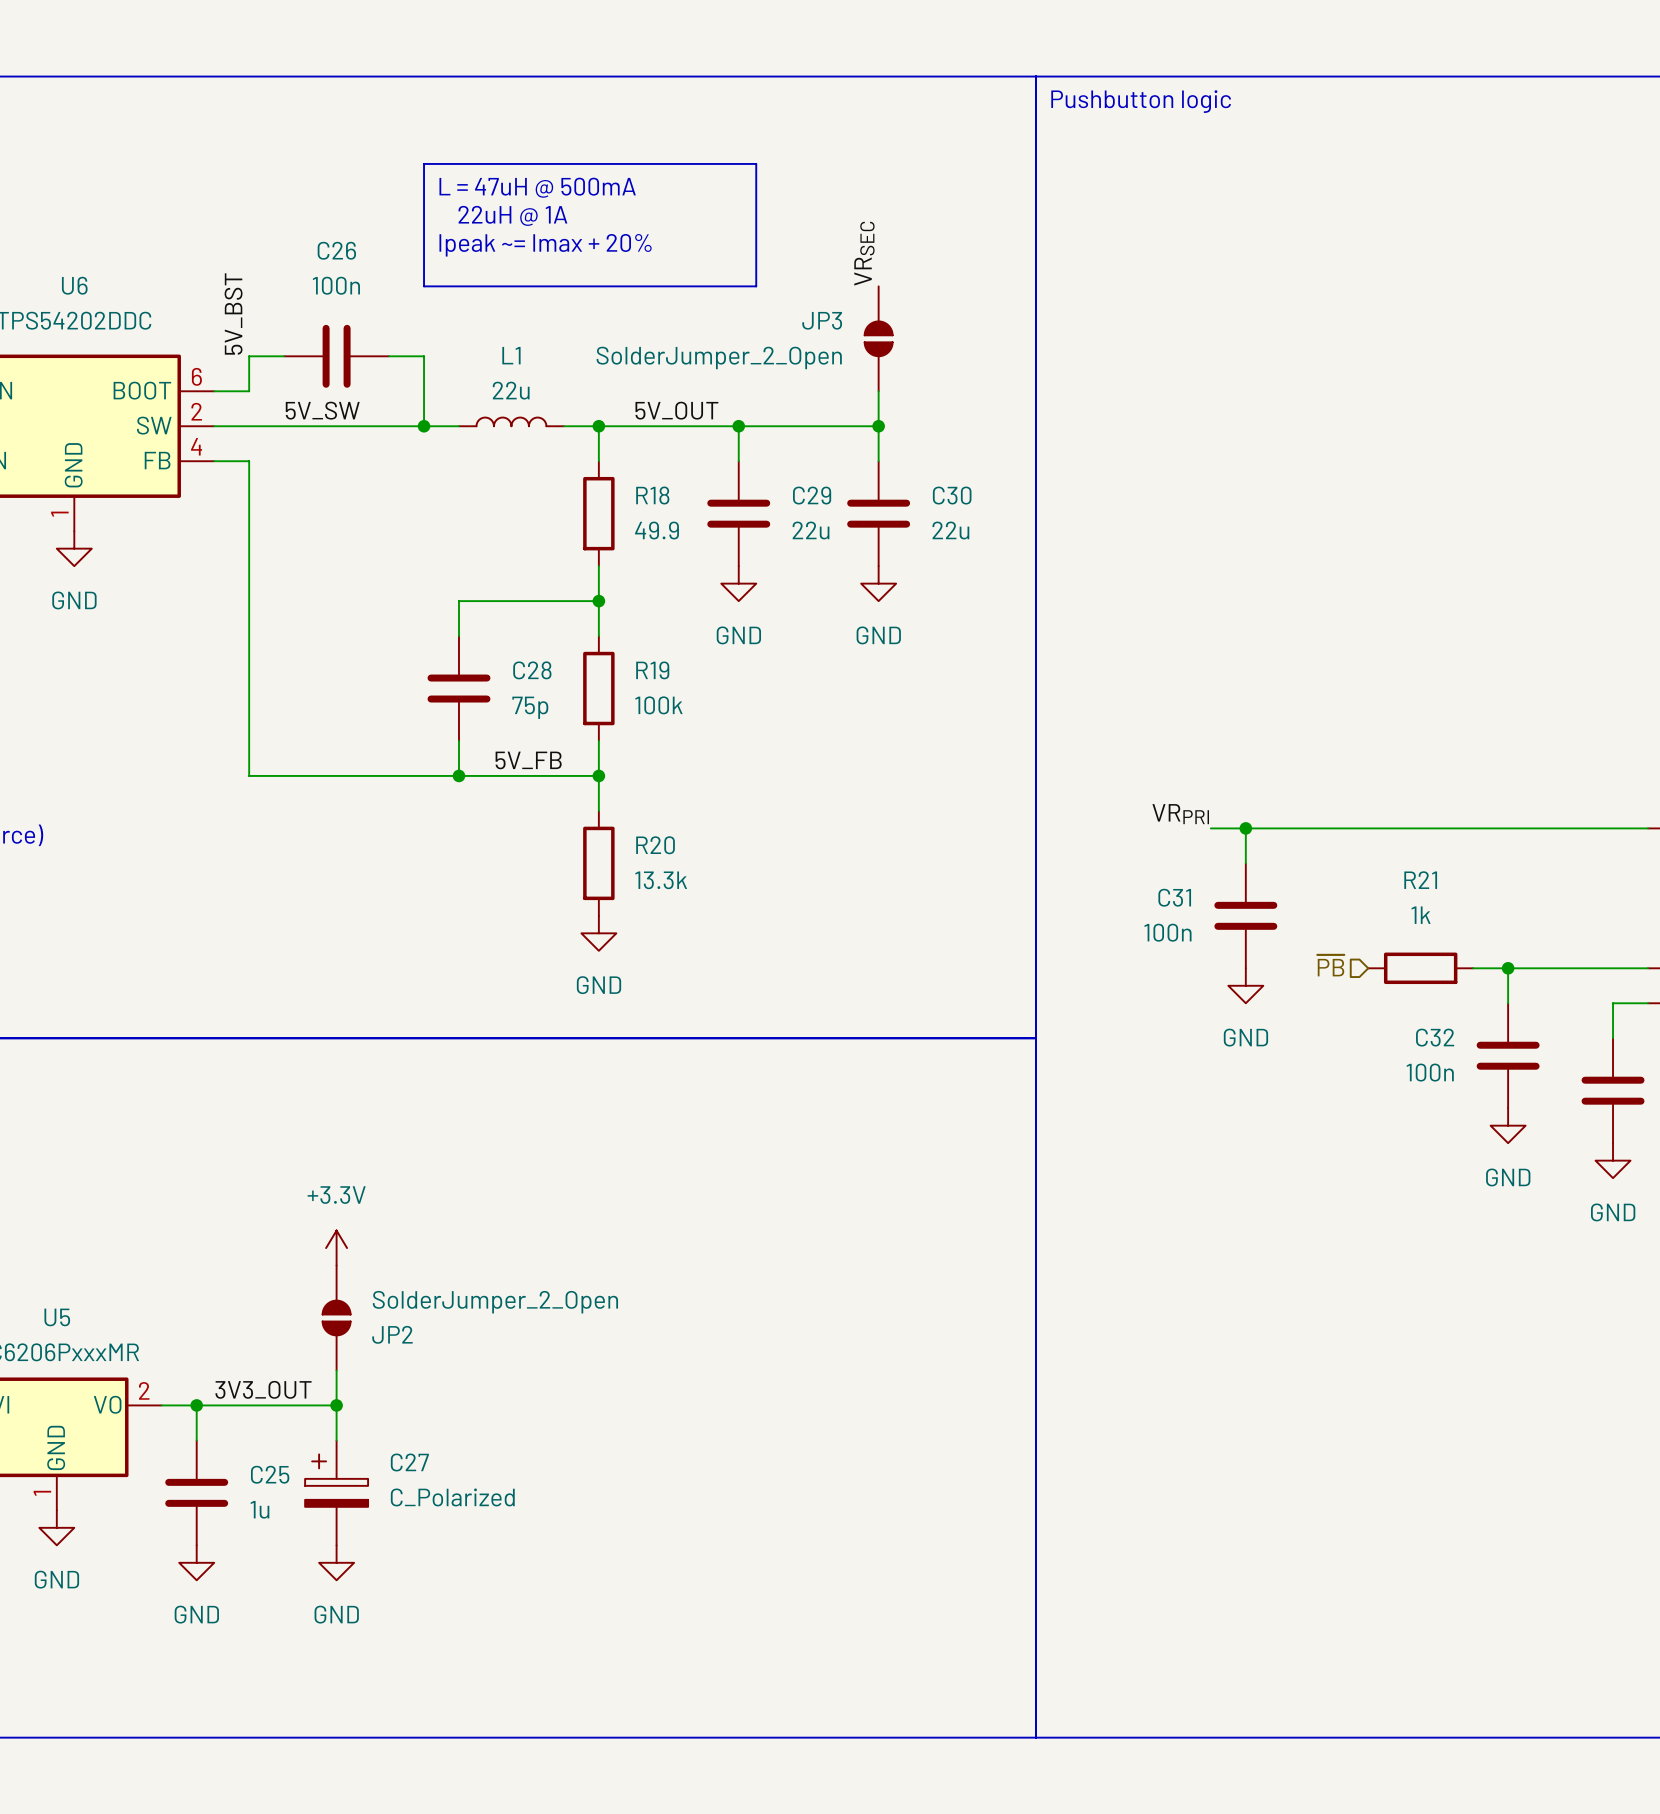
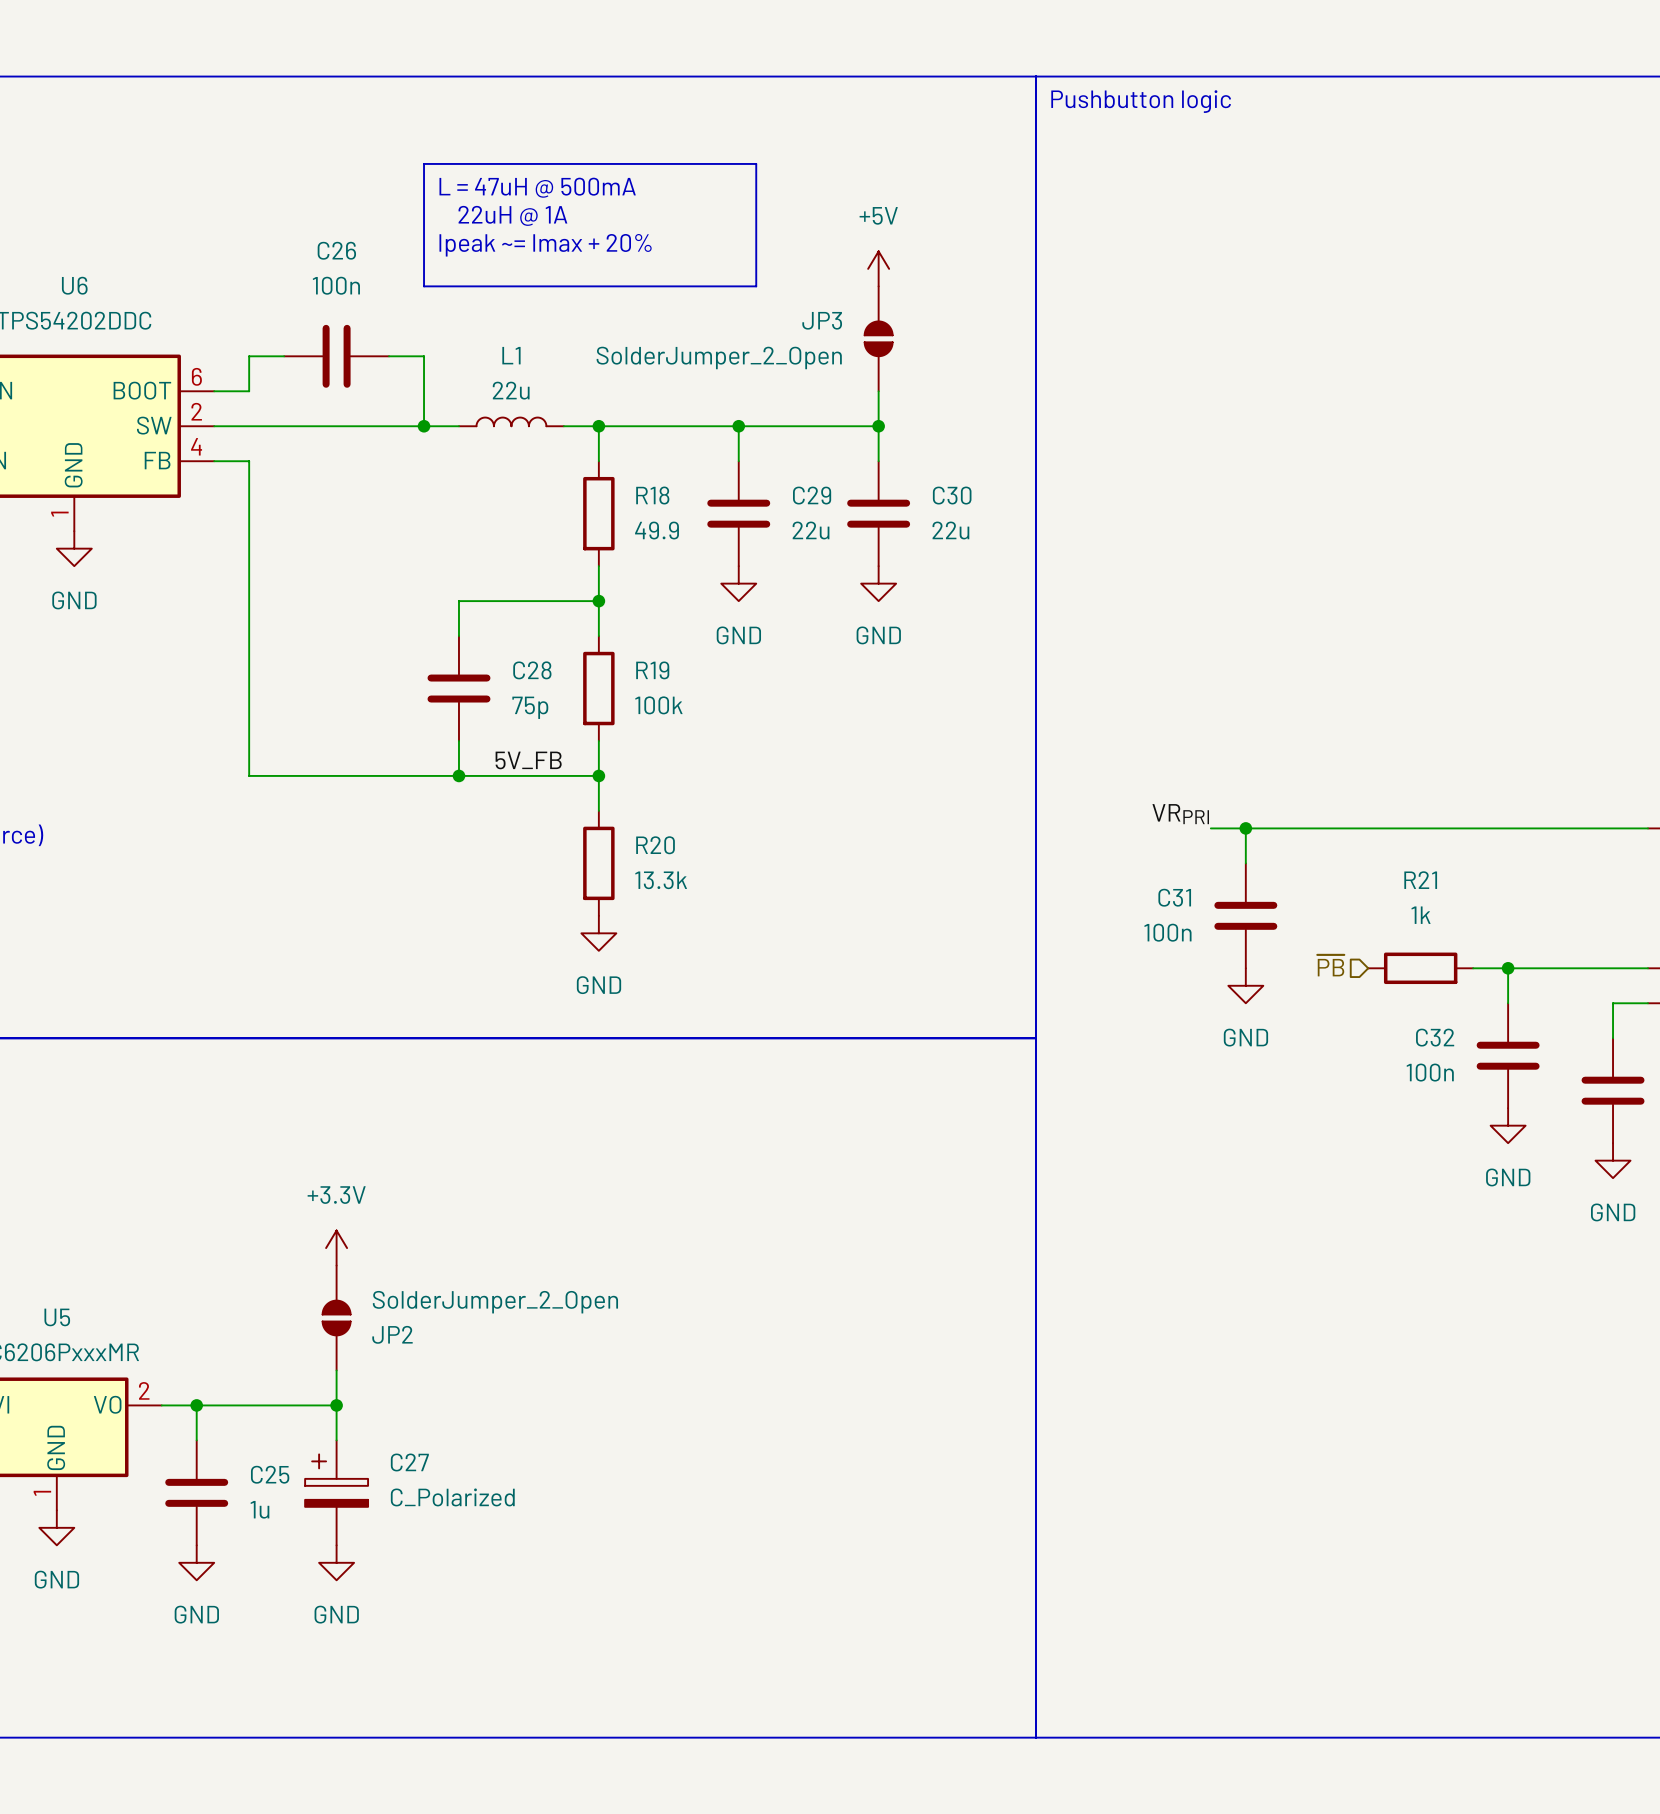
label: VRSEC (864, 253) -> none
power symbol: none -> +5V (878, 268)
label: 5V_BST (233, 313) -> none
label: 5V_SW (322, 410) -> none
label: 5V_OUT (676, 410) -> none
label: 3V3_OUT (263, 1389) -> none

